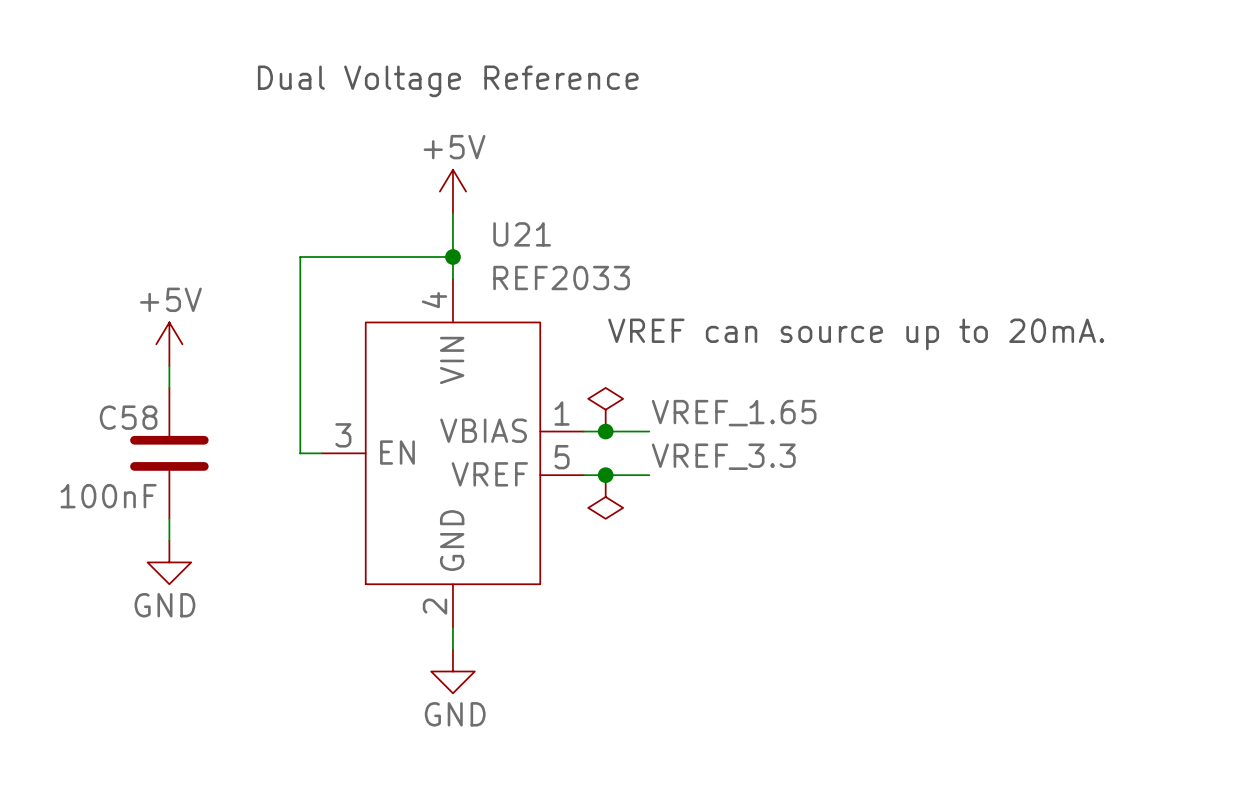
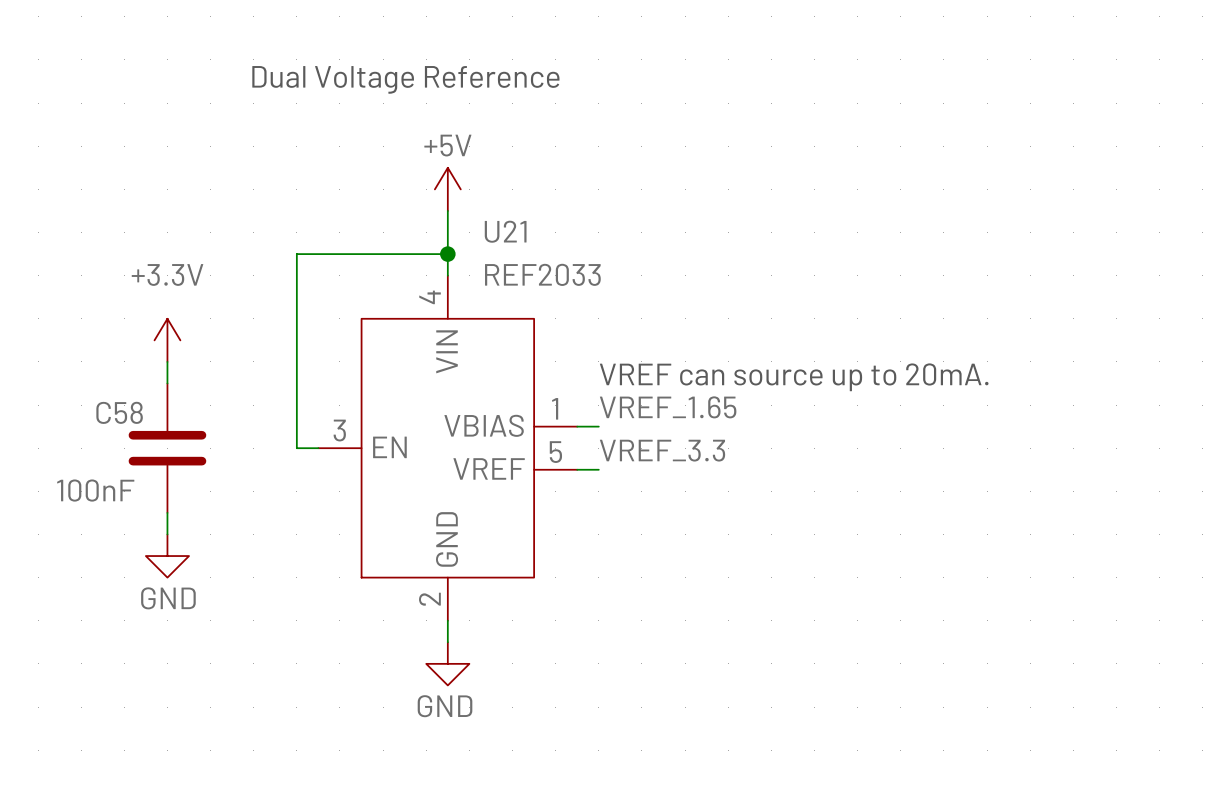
text position: VREF can source up to 20mA. (856, 334) -> VREF can source up to 20mA. (794, 377)
power symbol: +5V (169, 344) -> +3.3V (167, 340)
power symbol: (605, 409) -> none
label position: VREF_1.65 (734, 413) -> VREF_1.65 (668, 407)
wire: (605, 431) (649, 431) -> none
junction: (605, 431) -> none
label position: VREF_3.3 (723, 456) -> VREF_3.3 (662, 450)
wire: (605, 475) (649, 475) -> none
junction: (605, 475) -> none
power symbol: (605, 496) -> none

